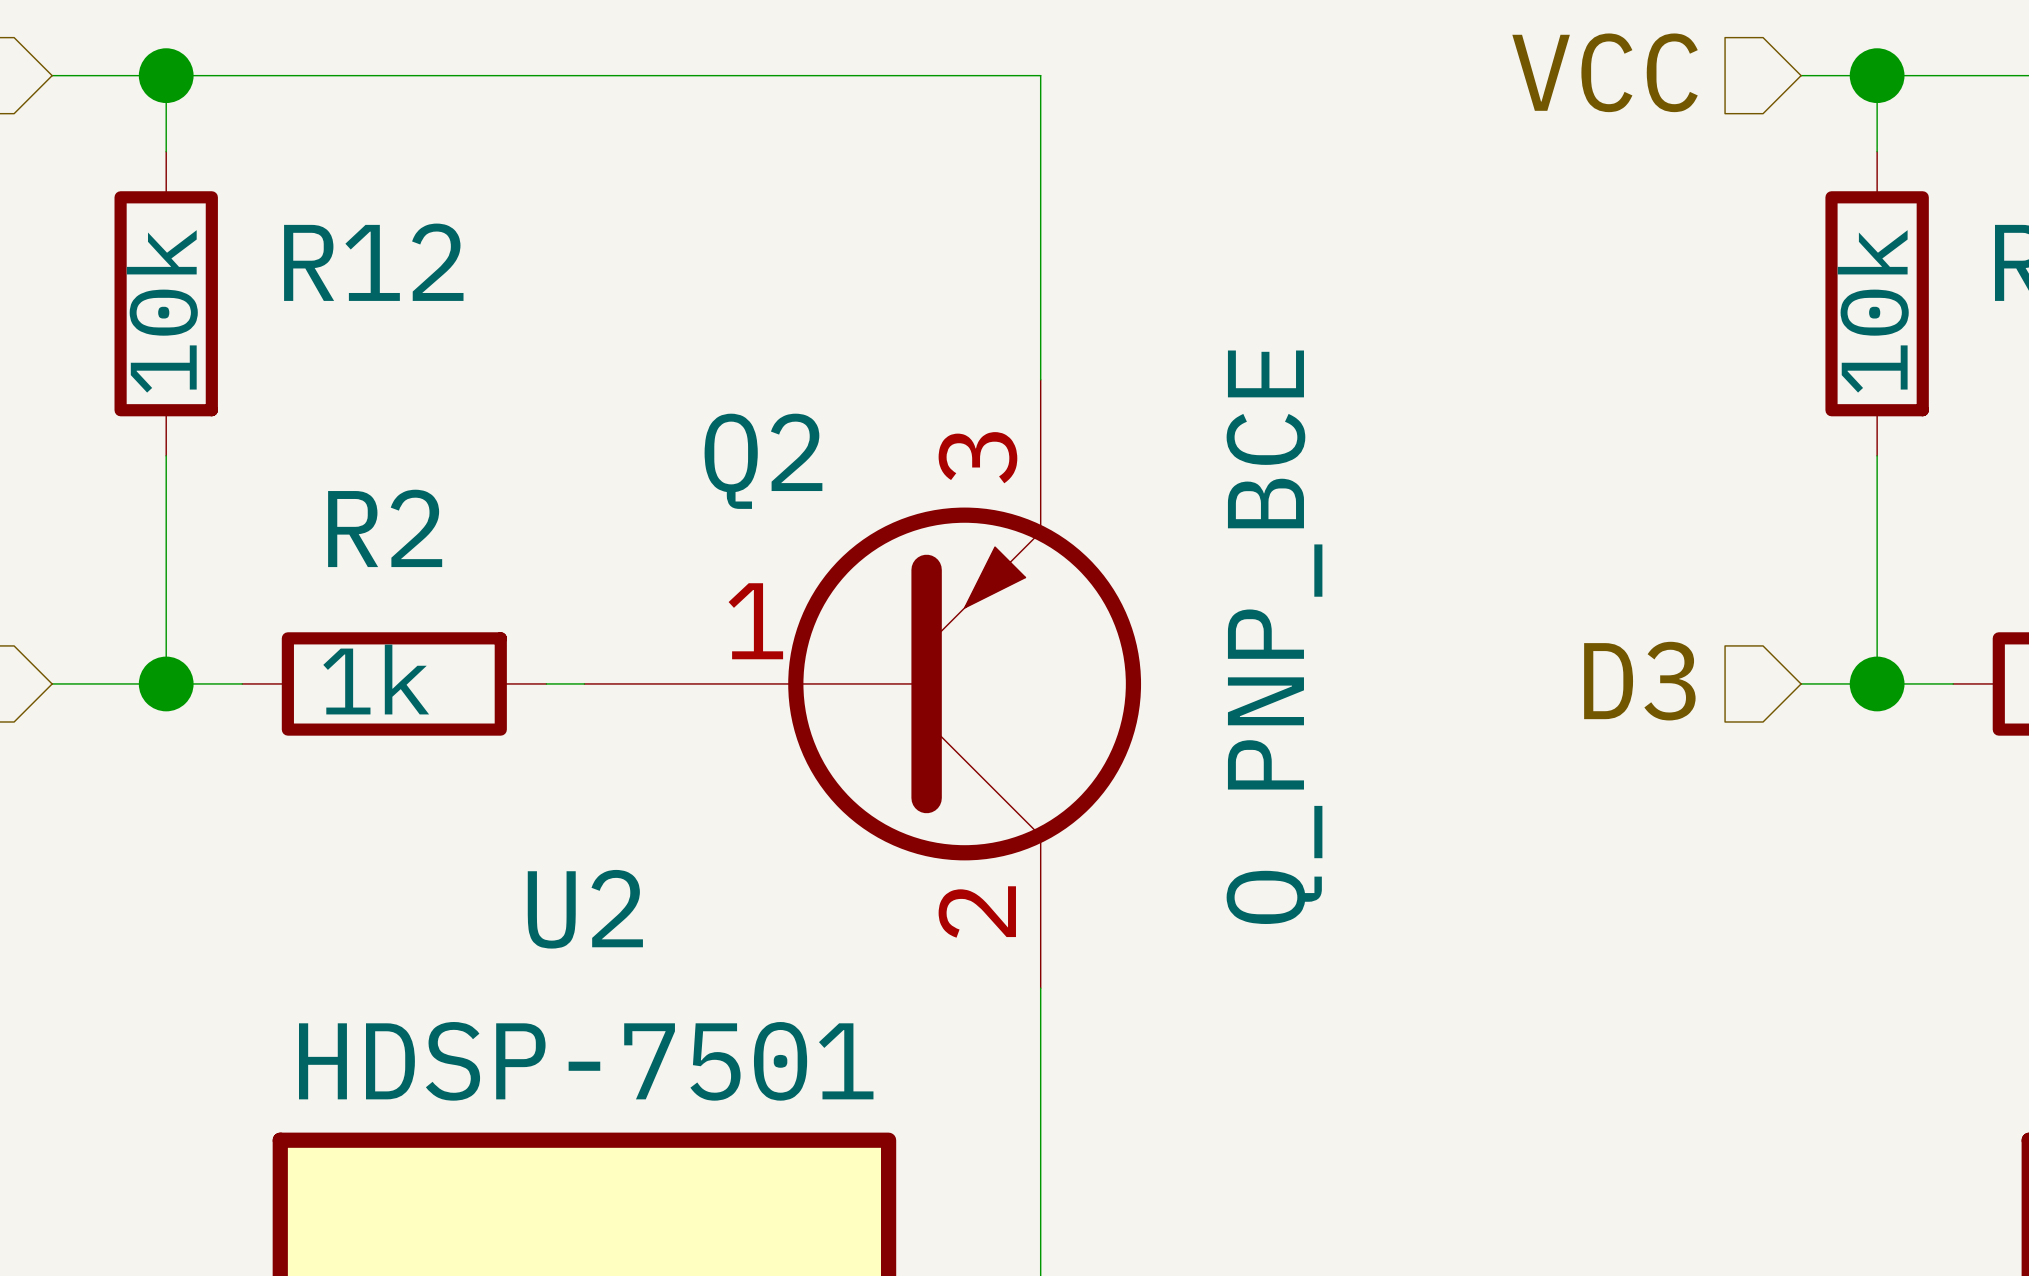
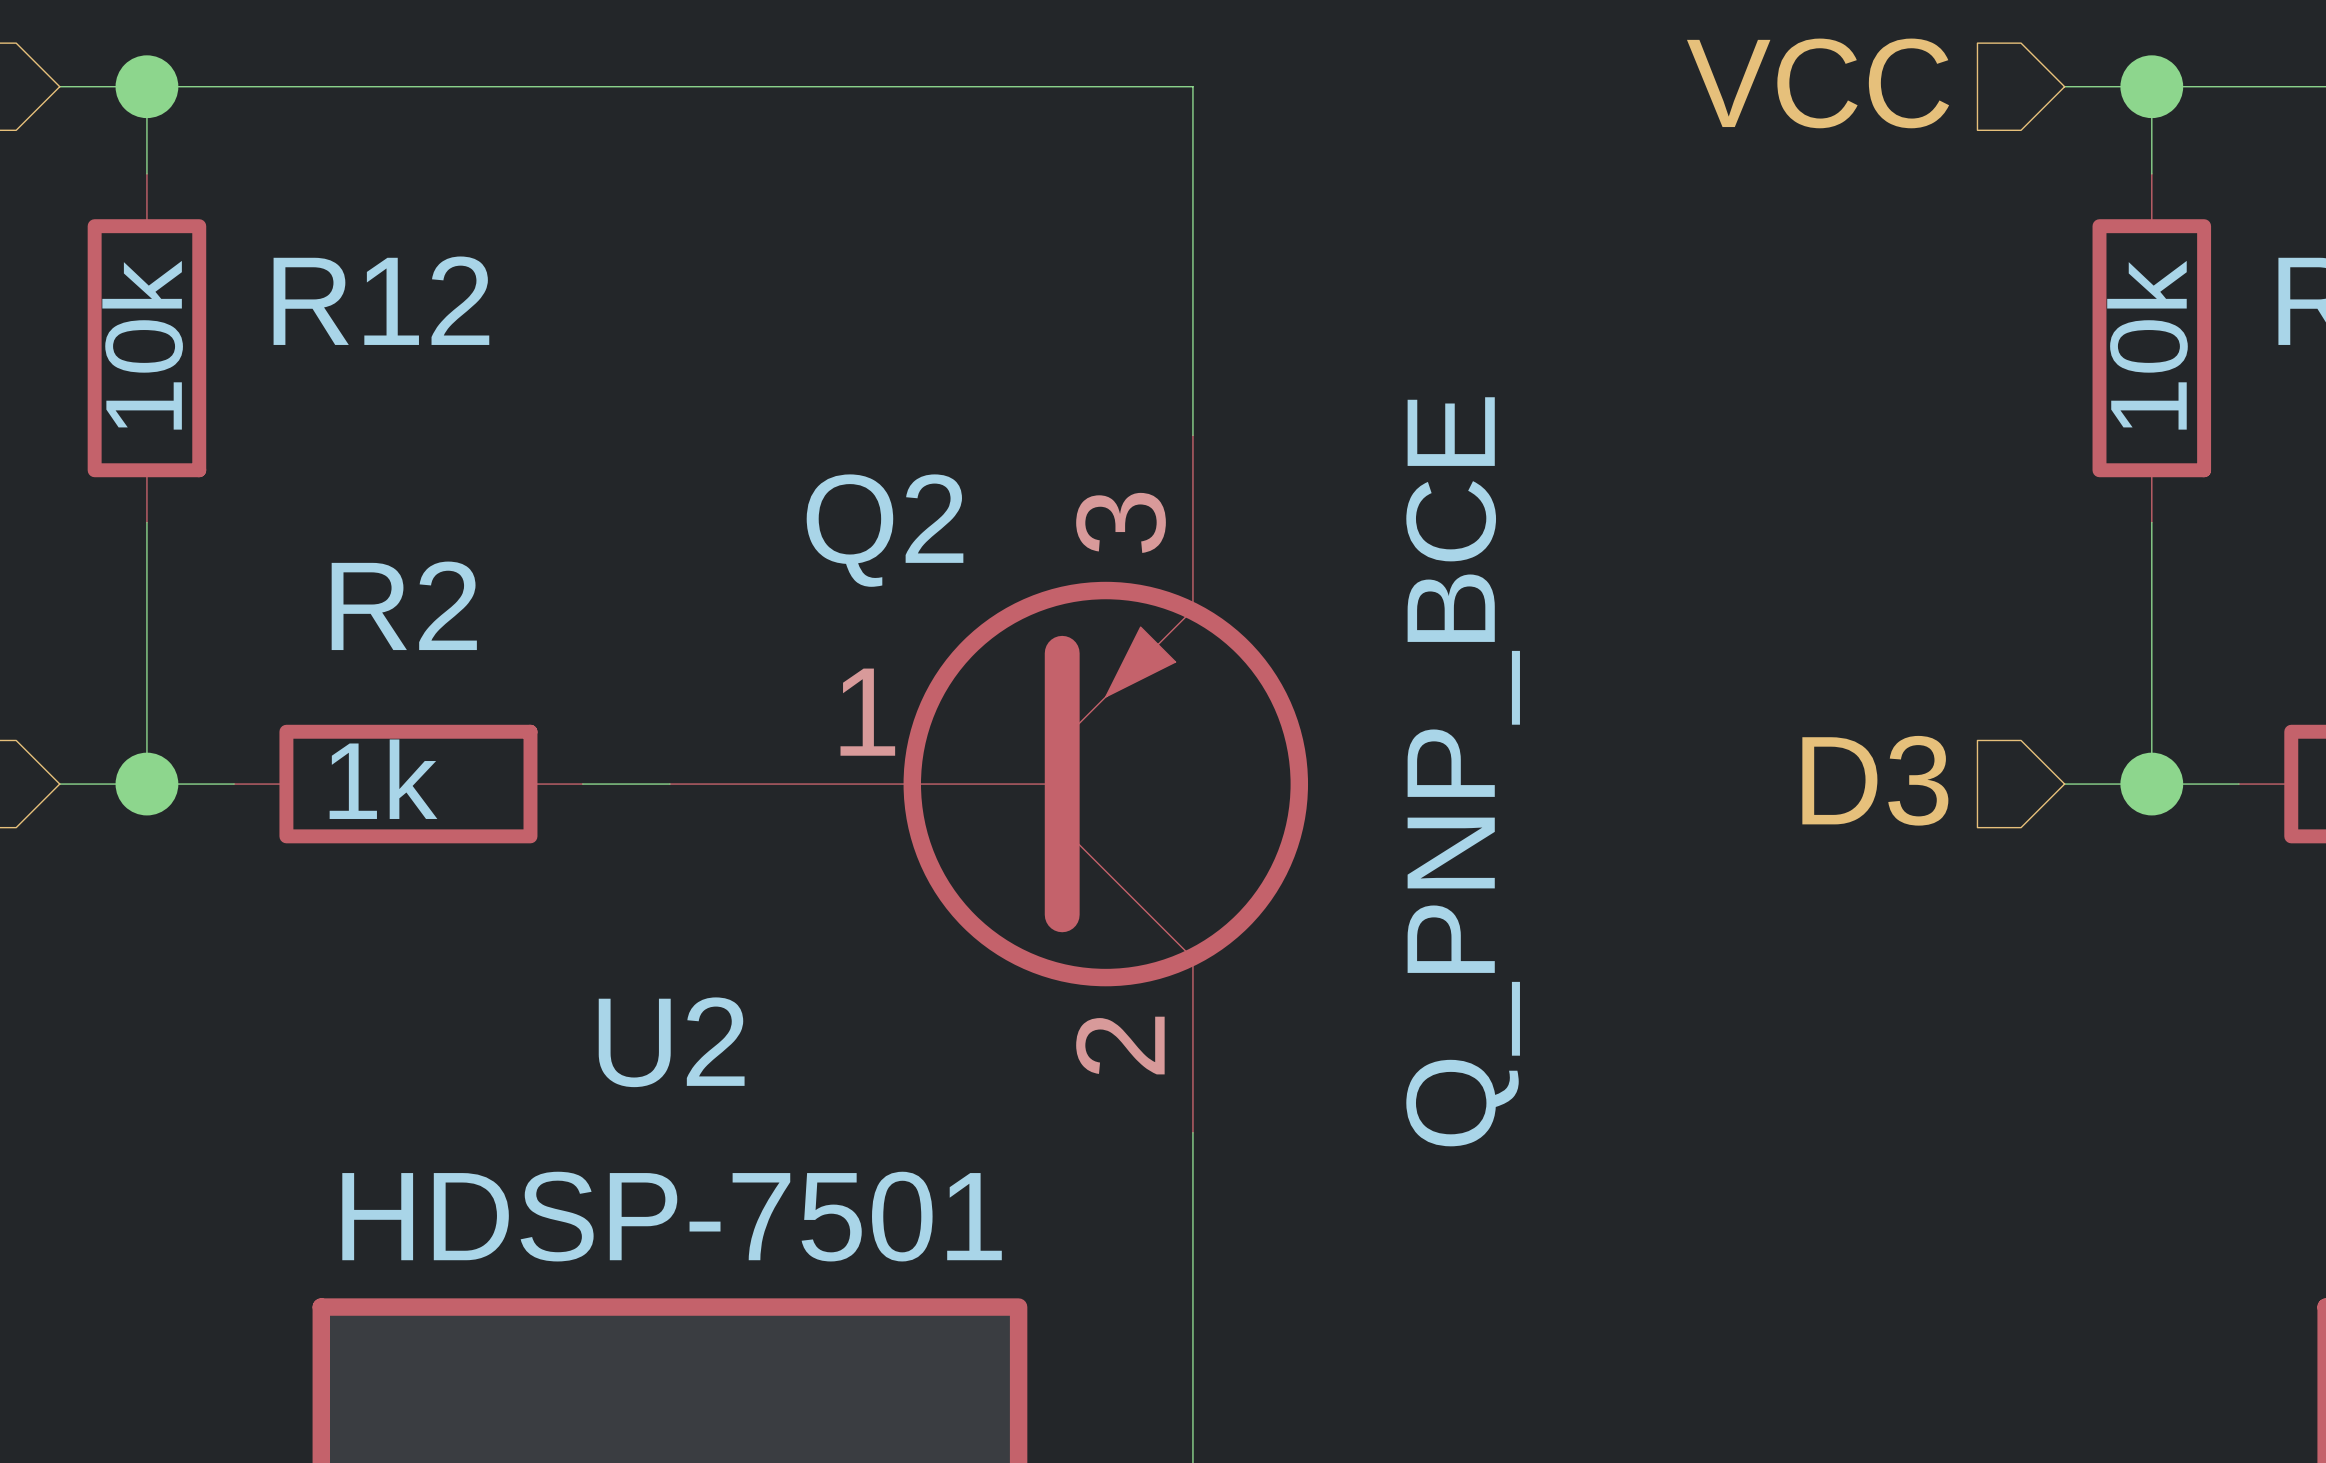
wire: (166, 75) (166, 151) -> (146, 86) (146, 173)
junction position: (166, 75) -> (146, 86)
R12 position: (166, 303) -> (146, 348)
wire: (166, 455) (166, 683) -> (146, 522) (146, 784)
junction position: (166, 683) -> (146, 784)
R2 position: (394, 683) -> (408, 784)

